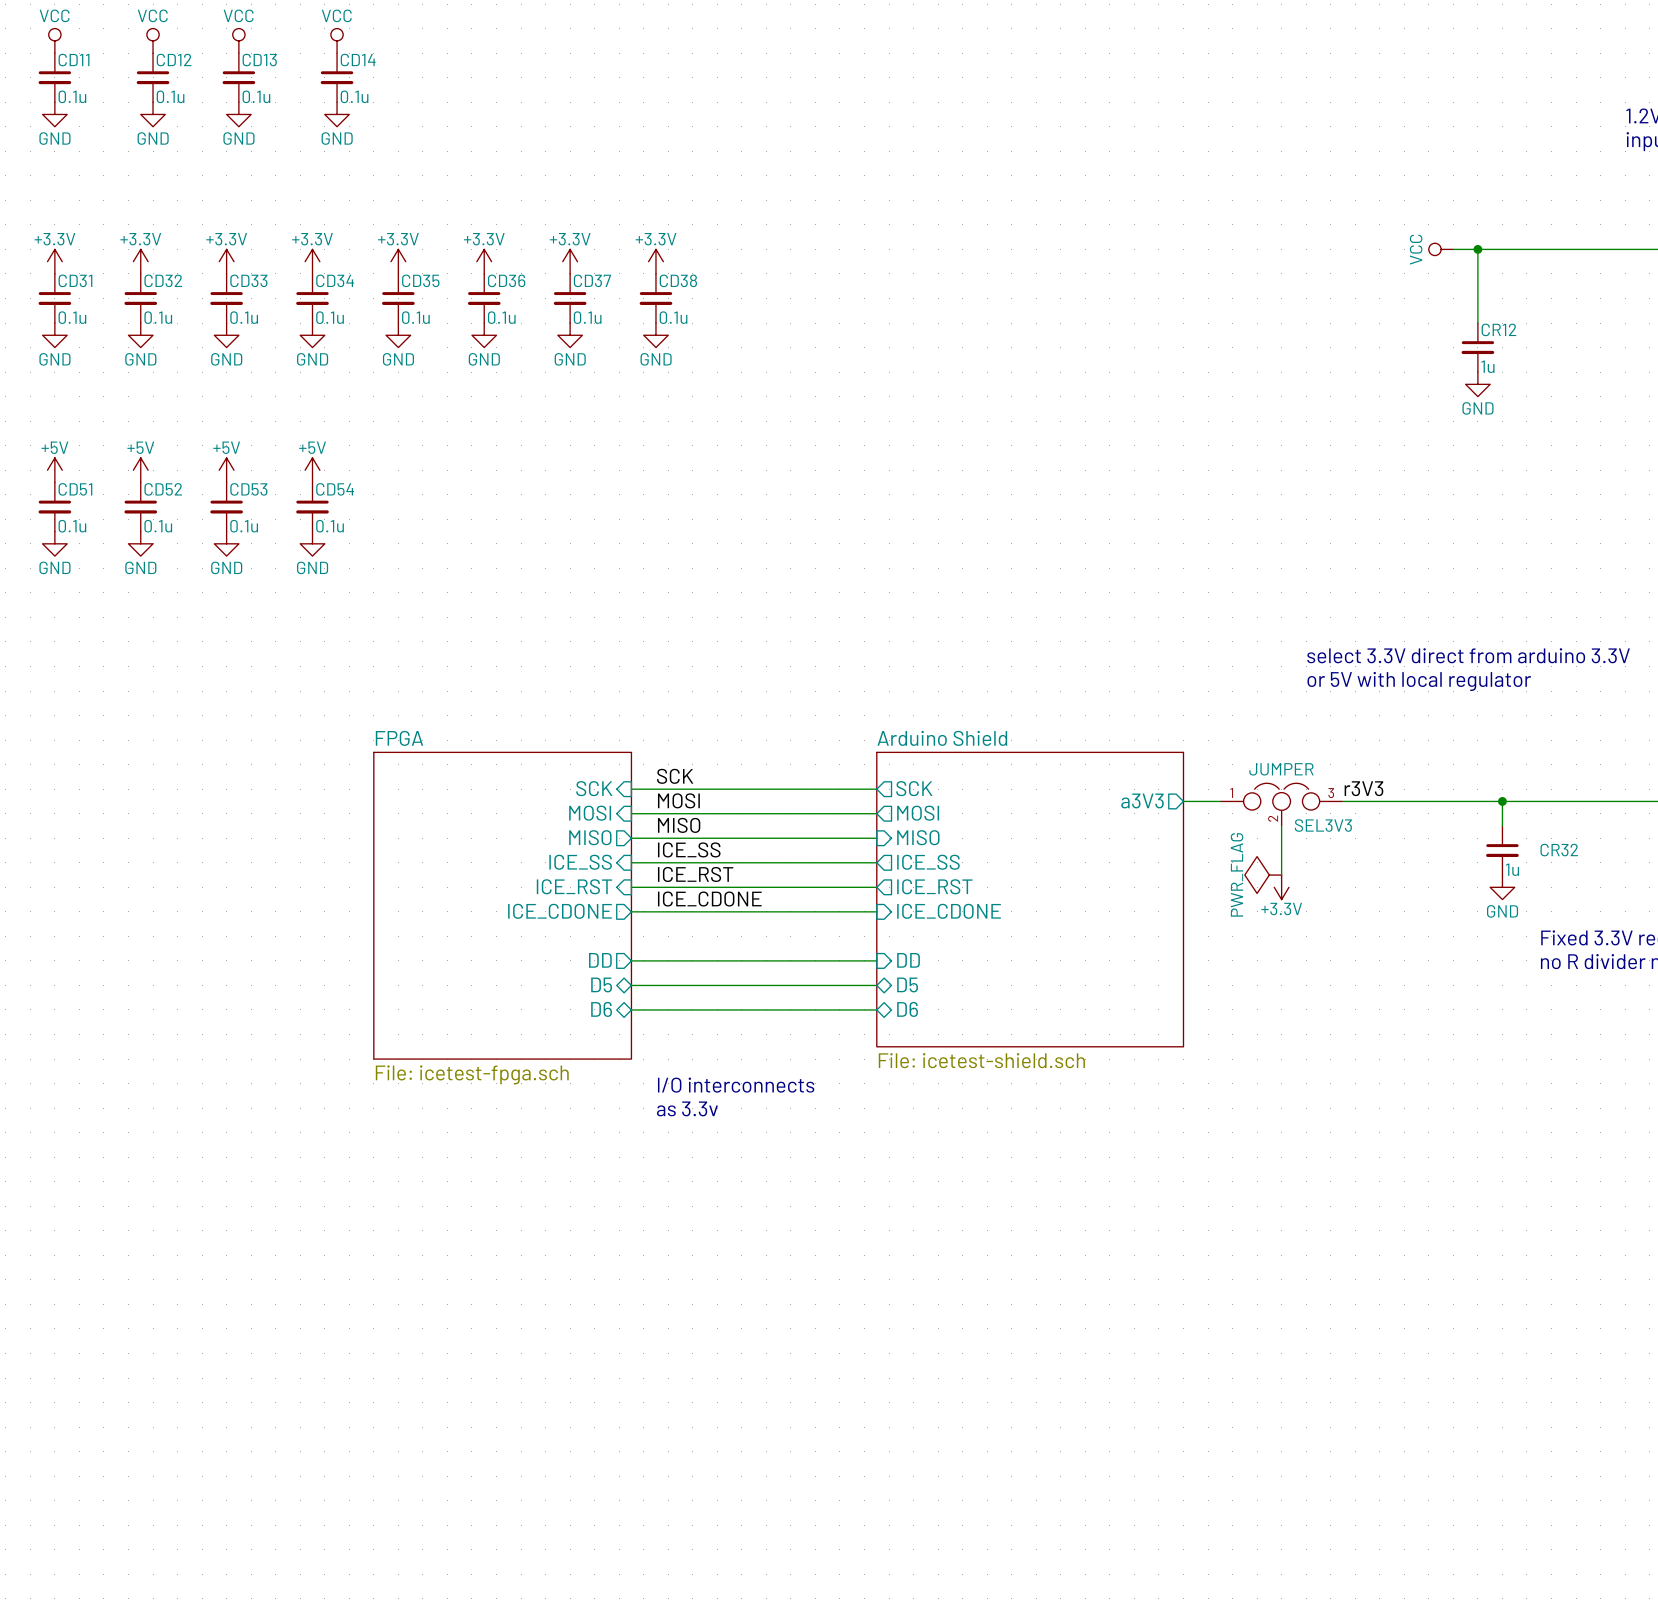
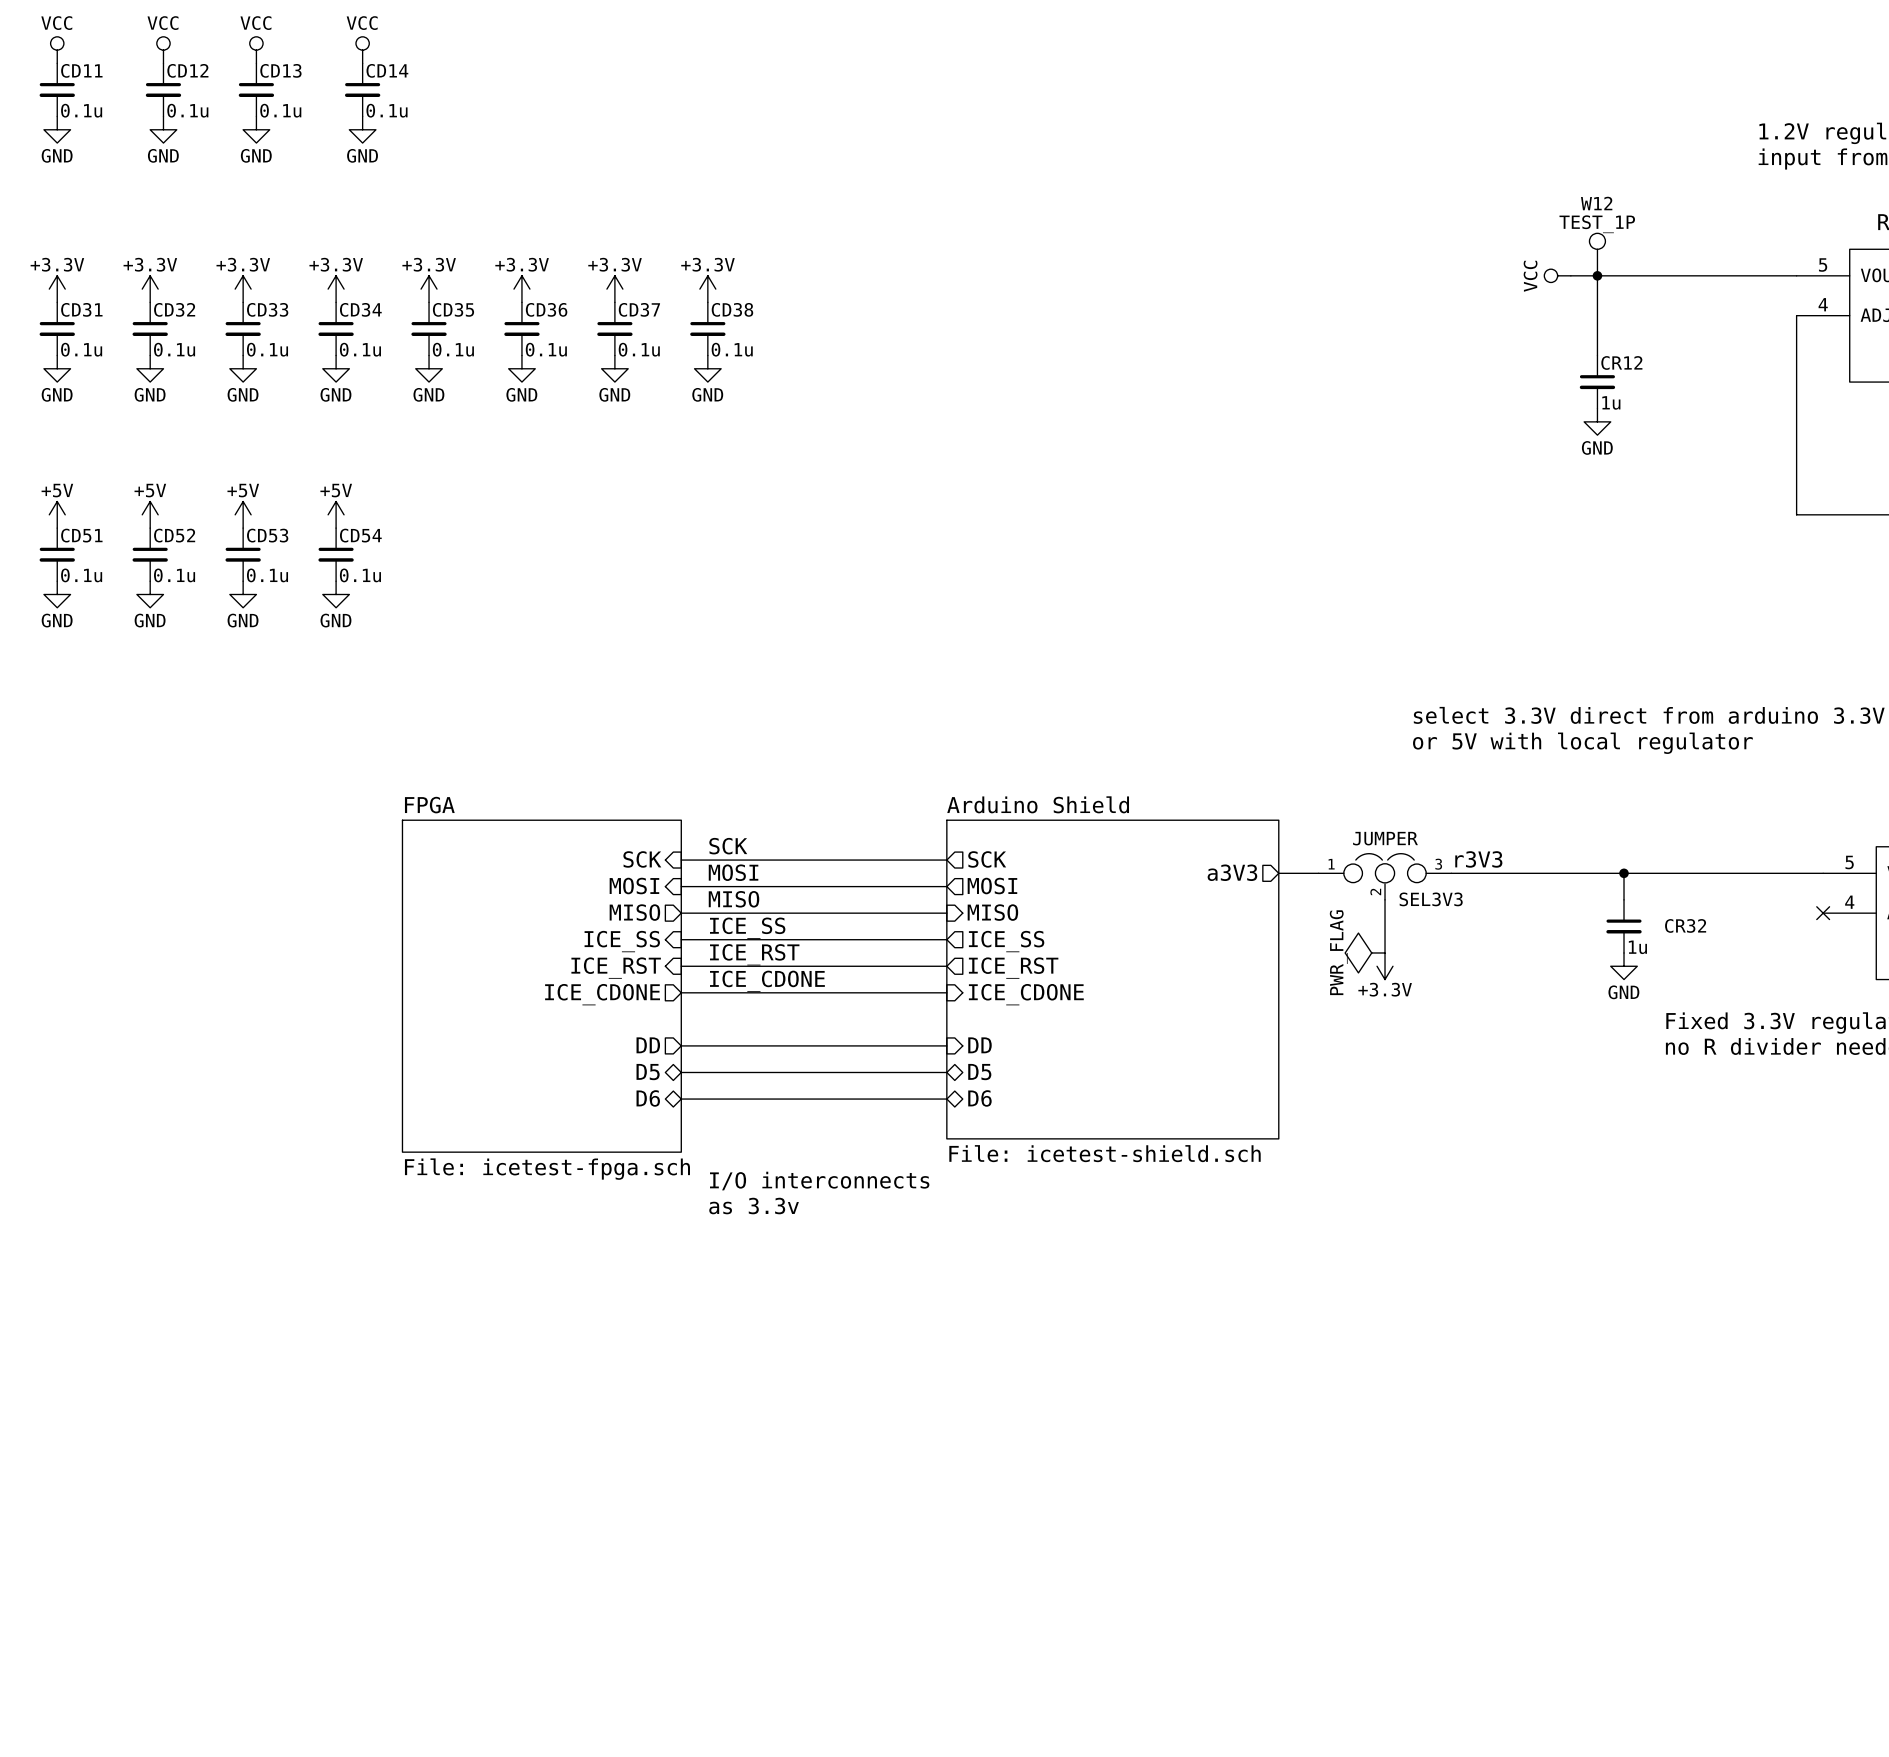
W12: none -> TEST_1P (1597, 254)

